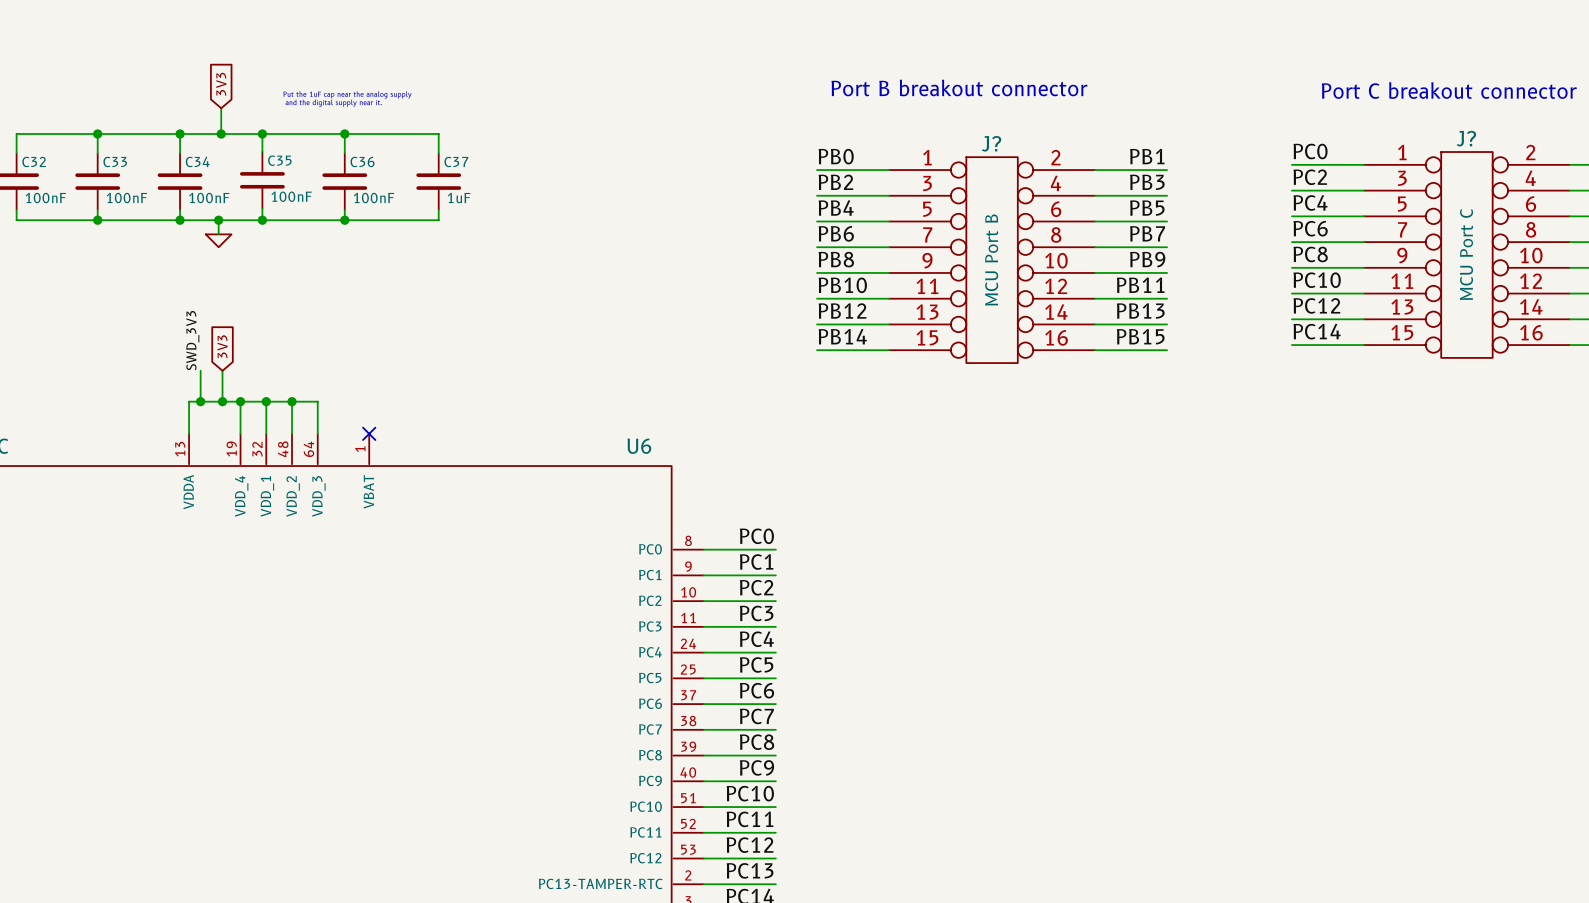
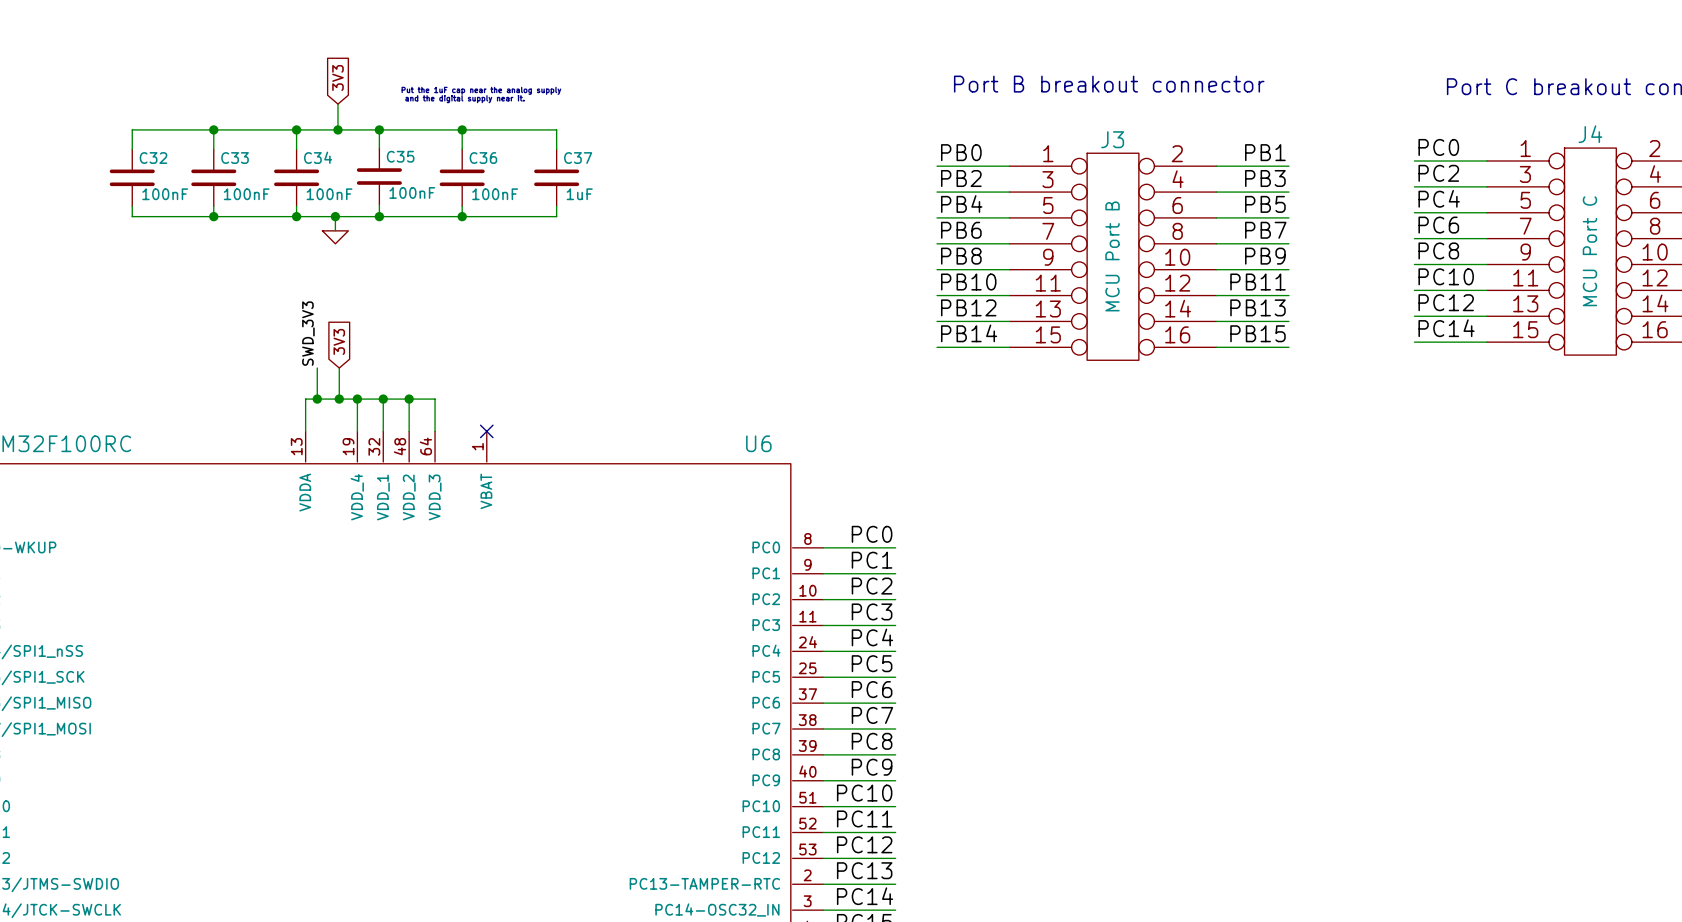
J? name: J? (1466, 138) -> J4 (1590, 134)
J? name: J? (991, 143) -> J3 (1112, 139)

